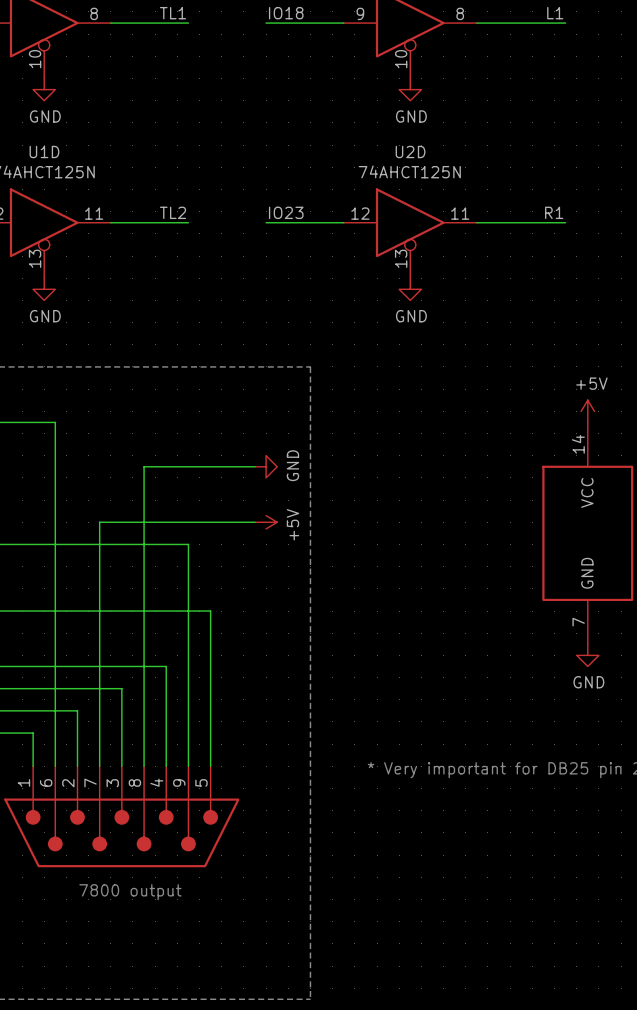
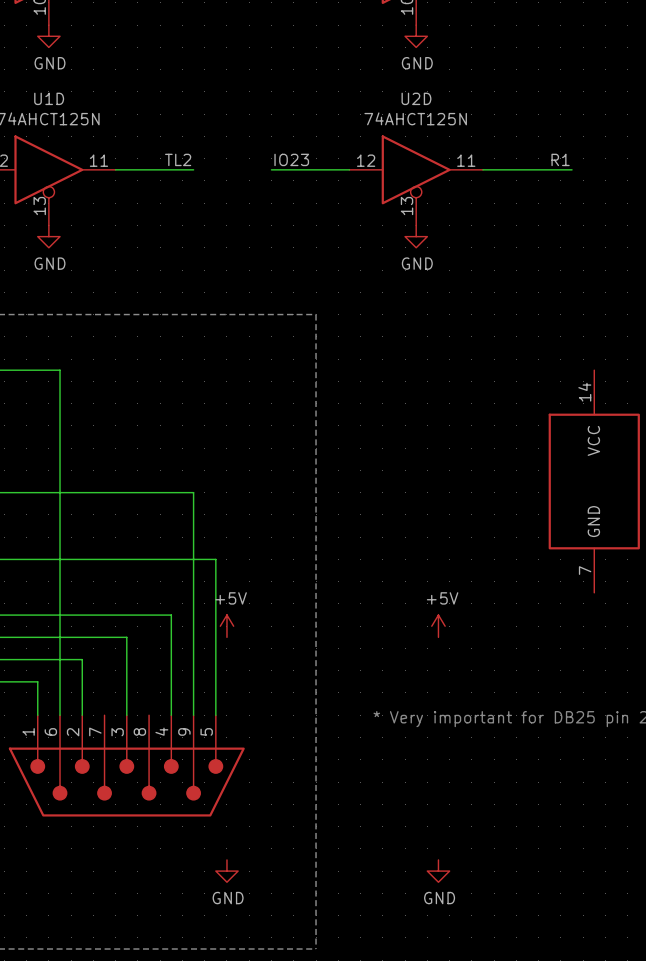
power symbol: +5V (587, 411) -> none
wire: (254, 466) (144, 466) (144, 766) -> none
power symbol: GND (266, 466) -> none
wire: (254, 522) (99, 522) (99, 766) -> none
power symbol: +5V (266, 522) -> none
power symbol: GND (587, 655) -> none
power symbol: none -> +5V (226, 626)
power symbol: none -> +5V (438, 626)
text: 7800 output (130, 892) -> none
power symbol: none -> GND (226, 871)
power symbol: none -> GND (438, 871)

